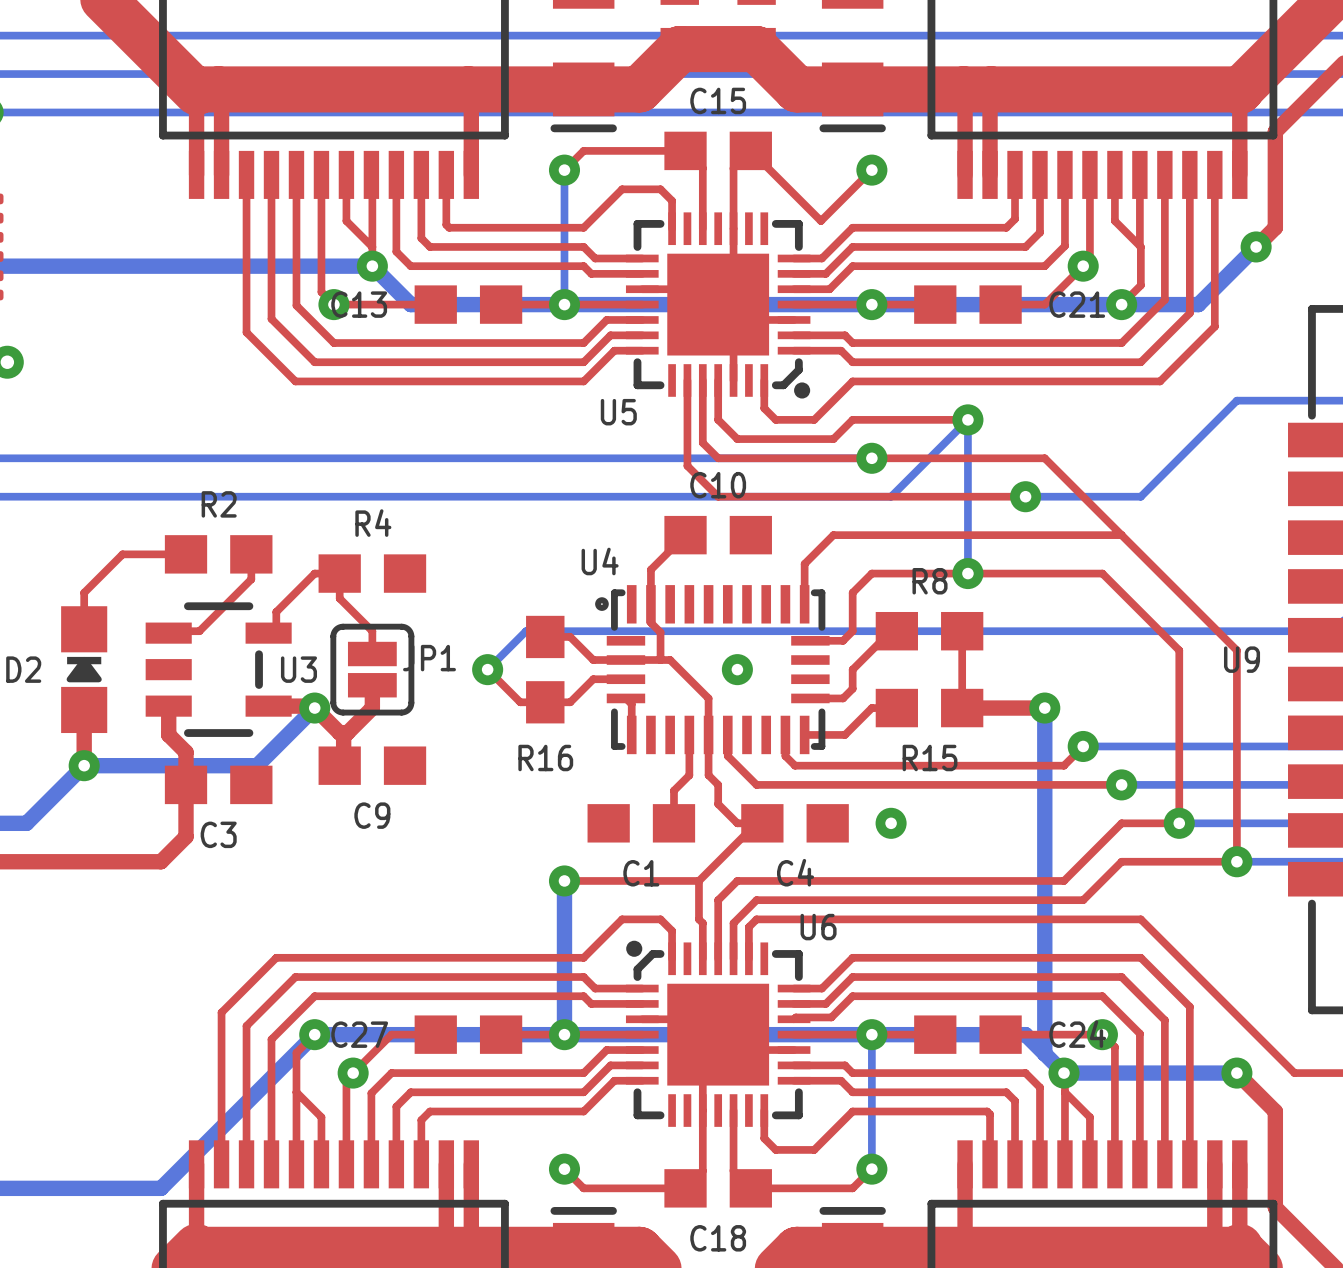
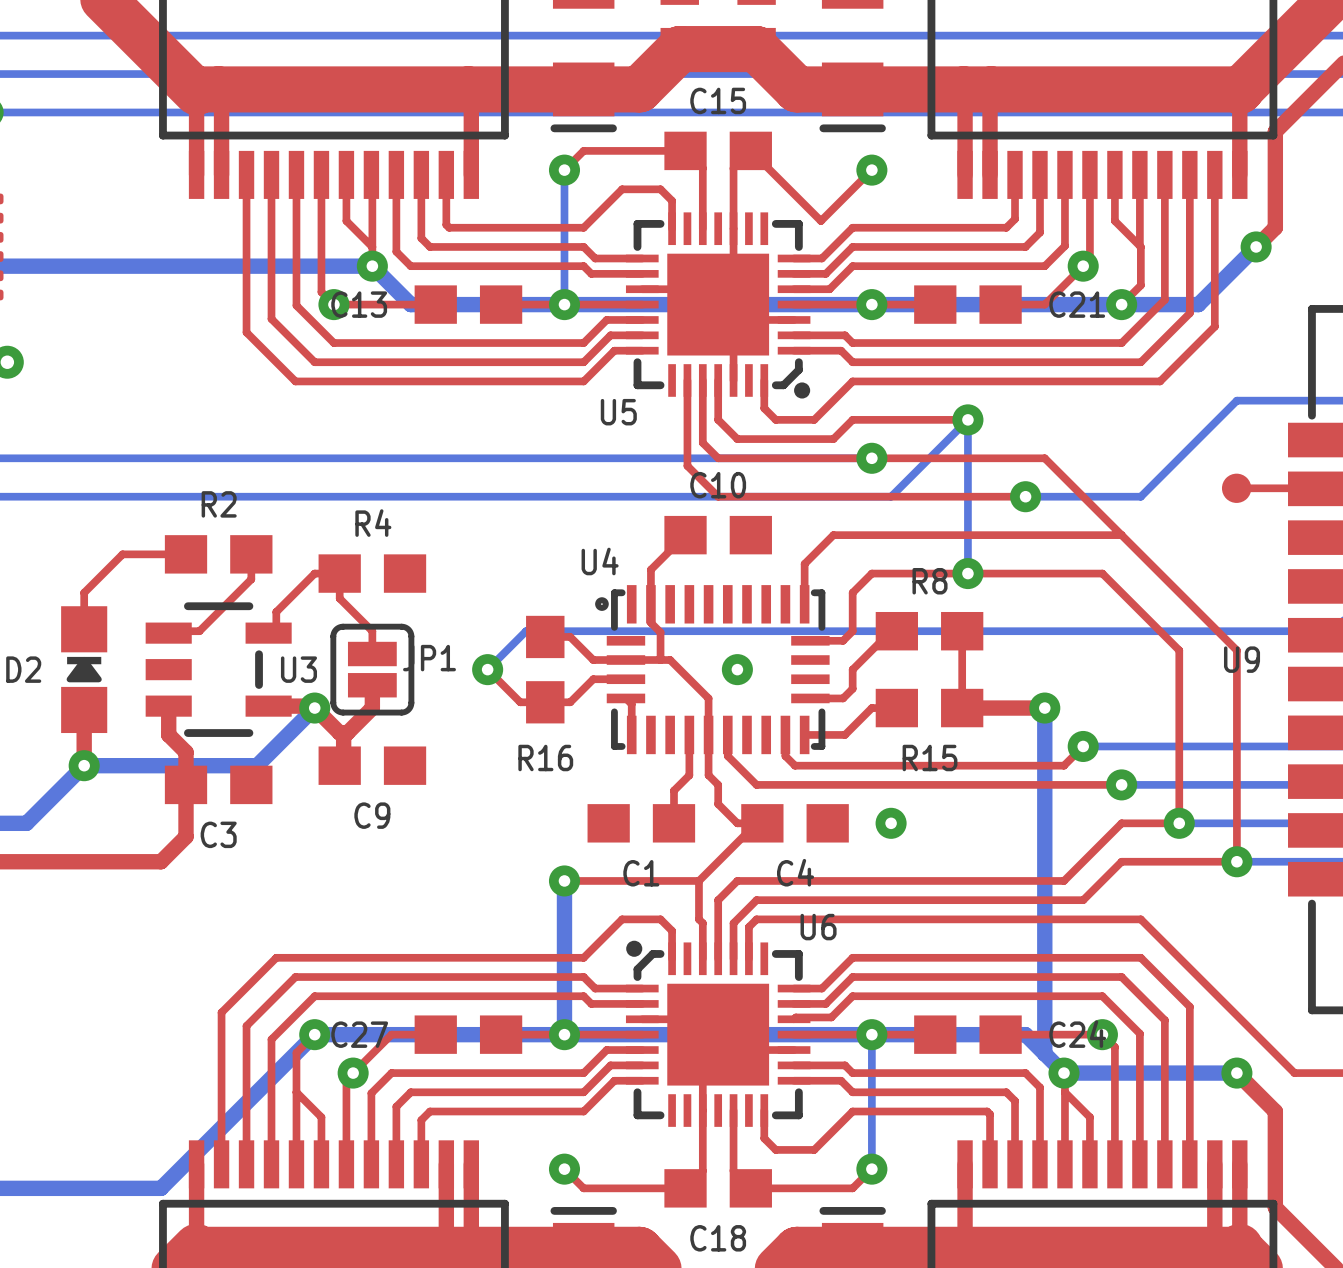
top track: none -> (1236, 488) (1316, 488)
part: none -> (1236, 488)

